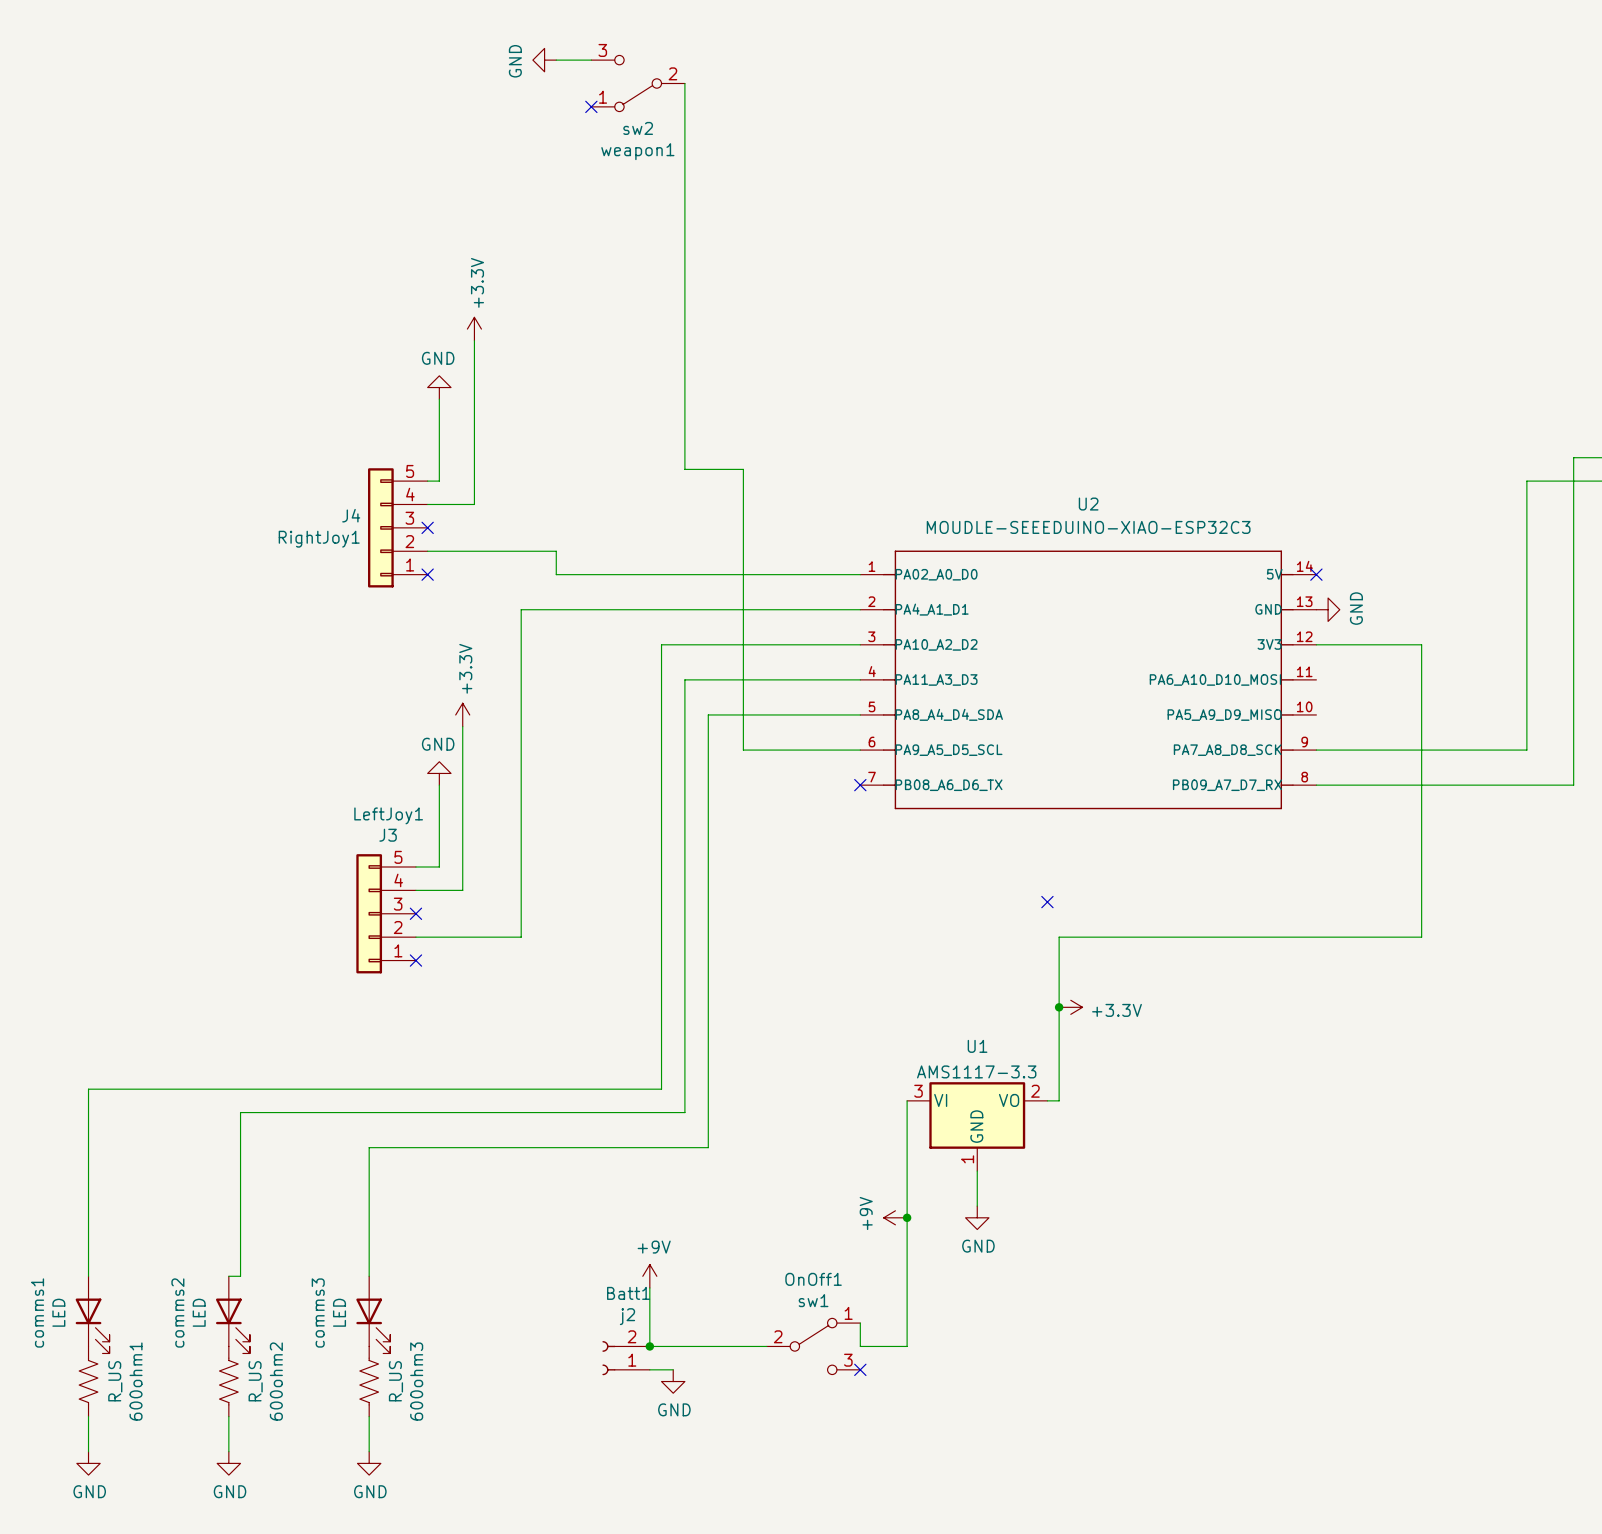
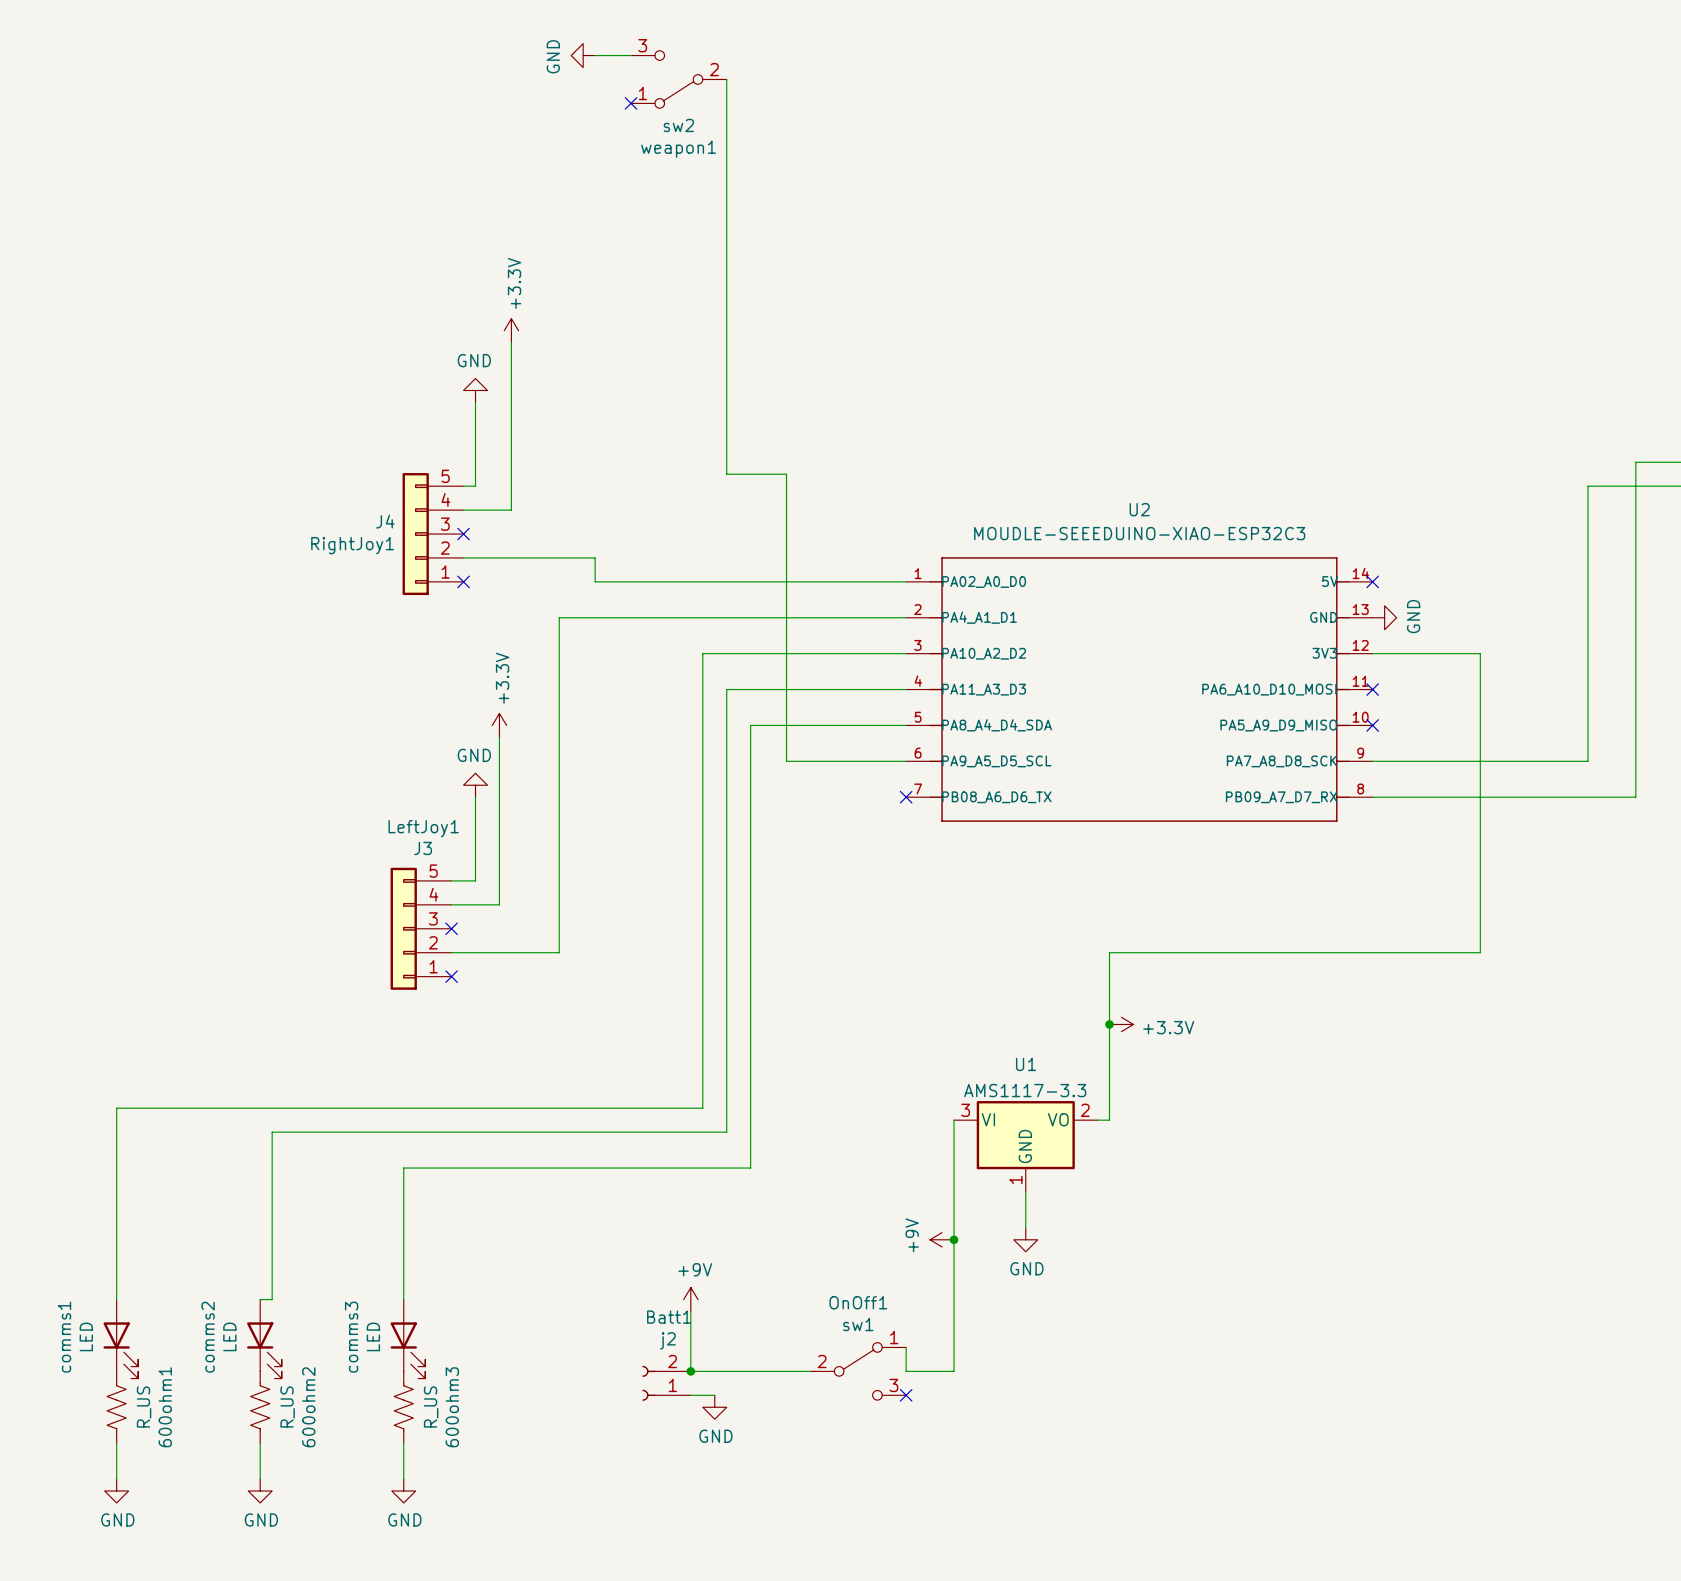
no-connect mark: none -> (1372, 689)
no-connect mark: none -> (1372, 725)
no-connect mark: (1047, 902) -> none

